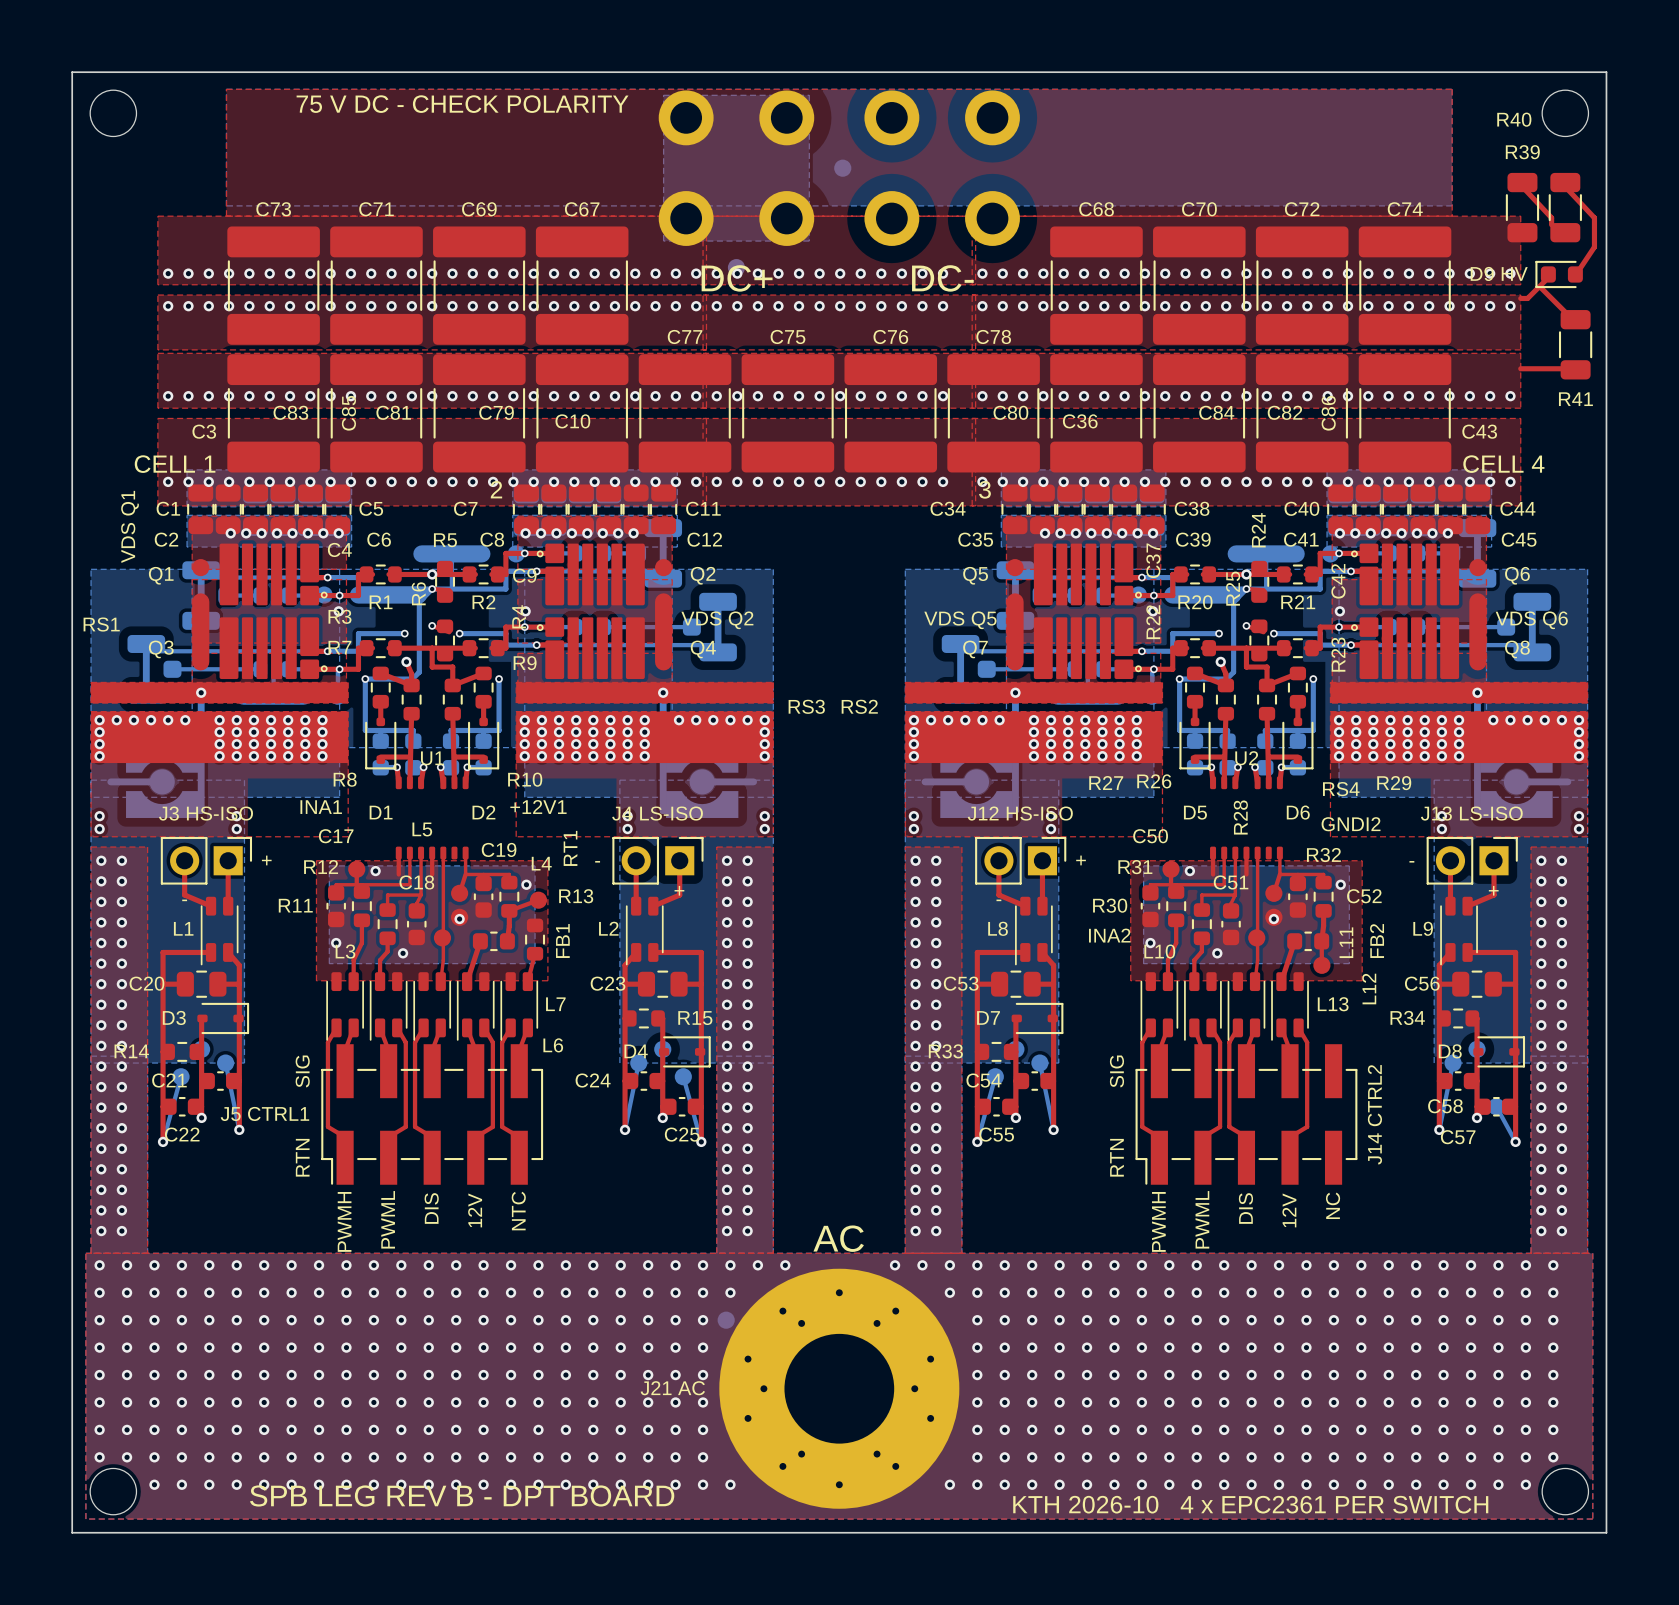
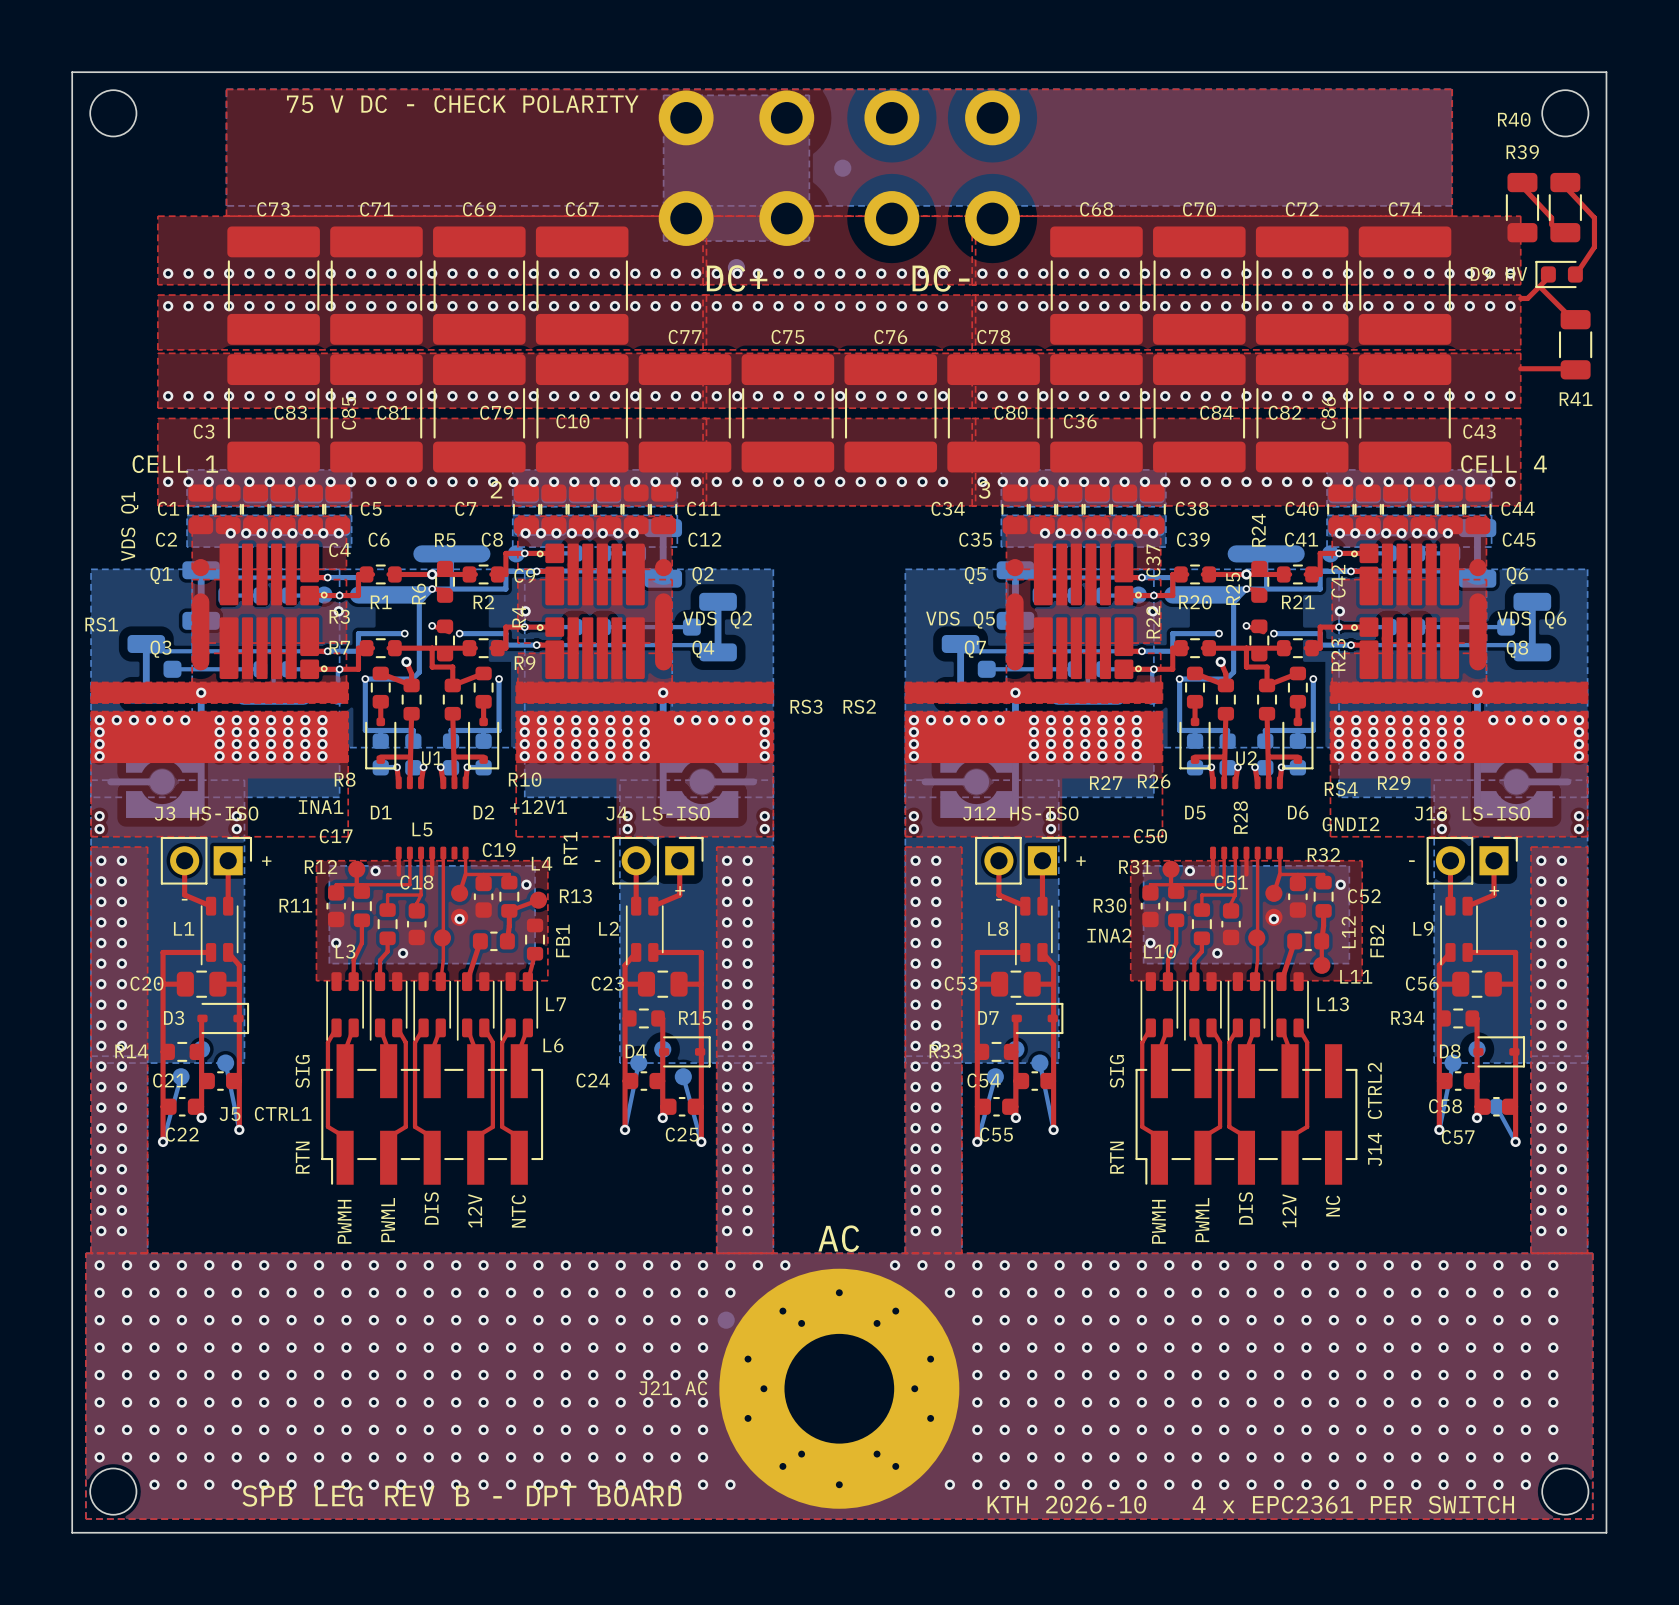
text rotation: 0° (1346, 942) -> 90° clockwise (1356, 976)
text position: L12 (1369, 989) -> L12 (1348, 932)

